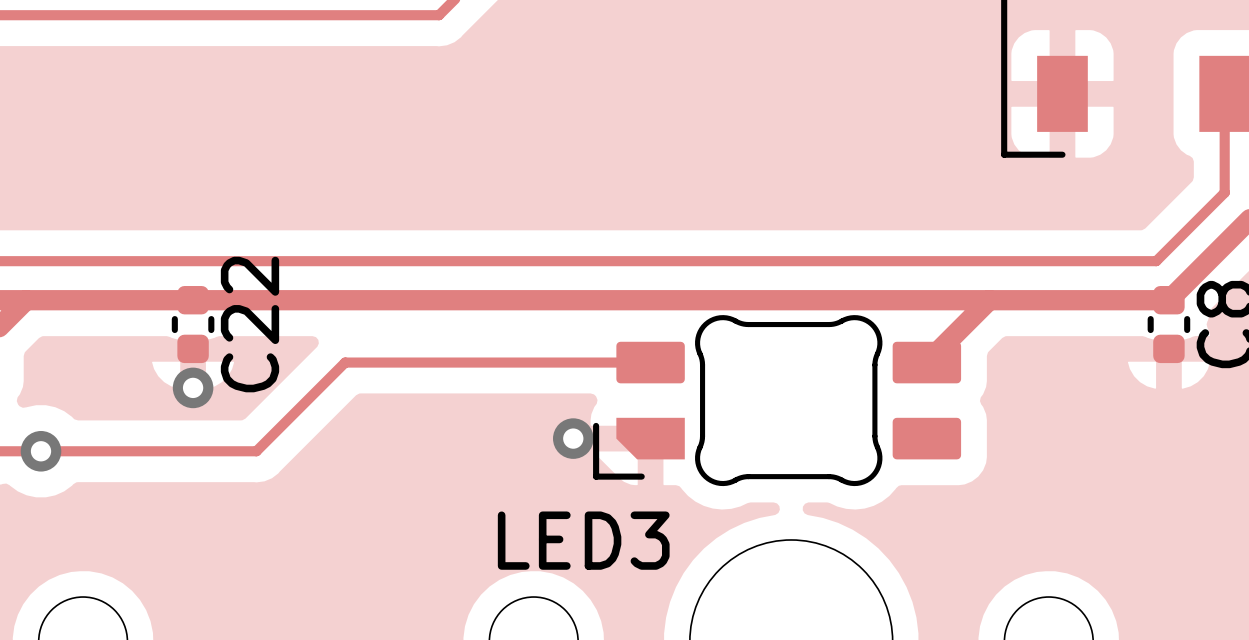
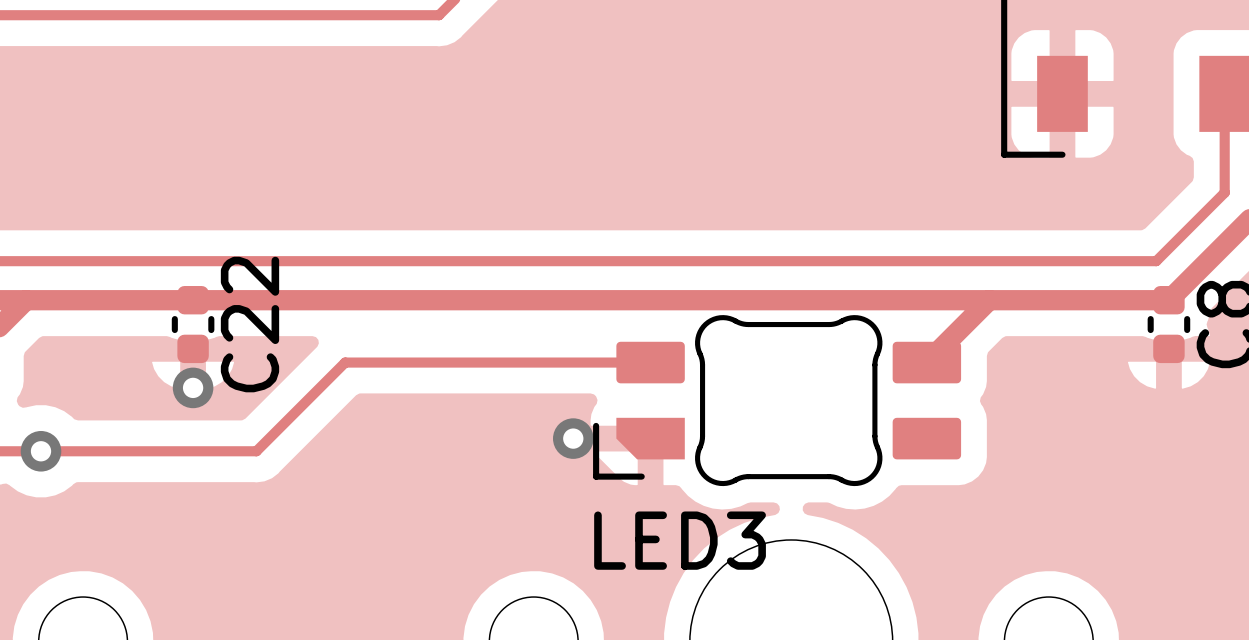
LED3 name position: LED3 (583, 540) -> LED3 (680, 540)

